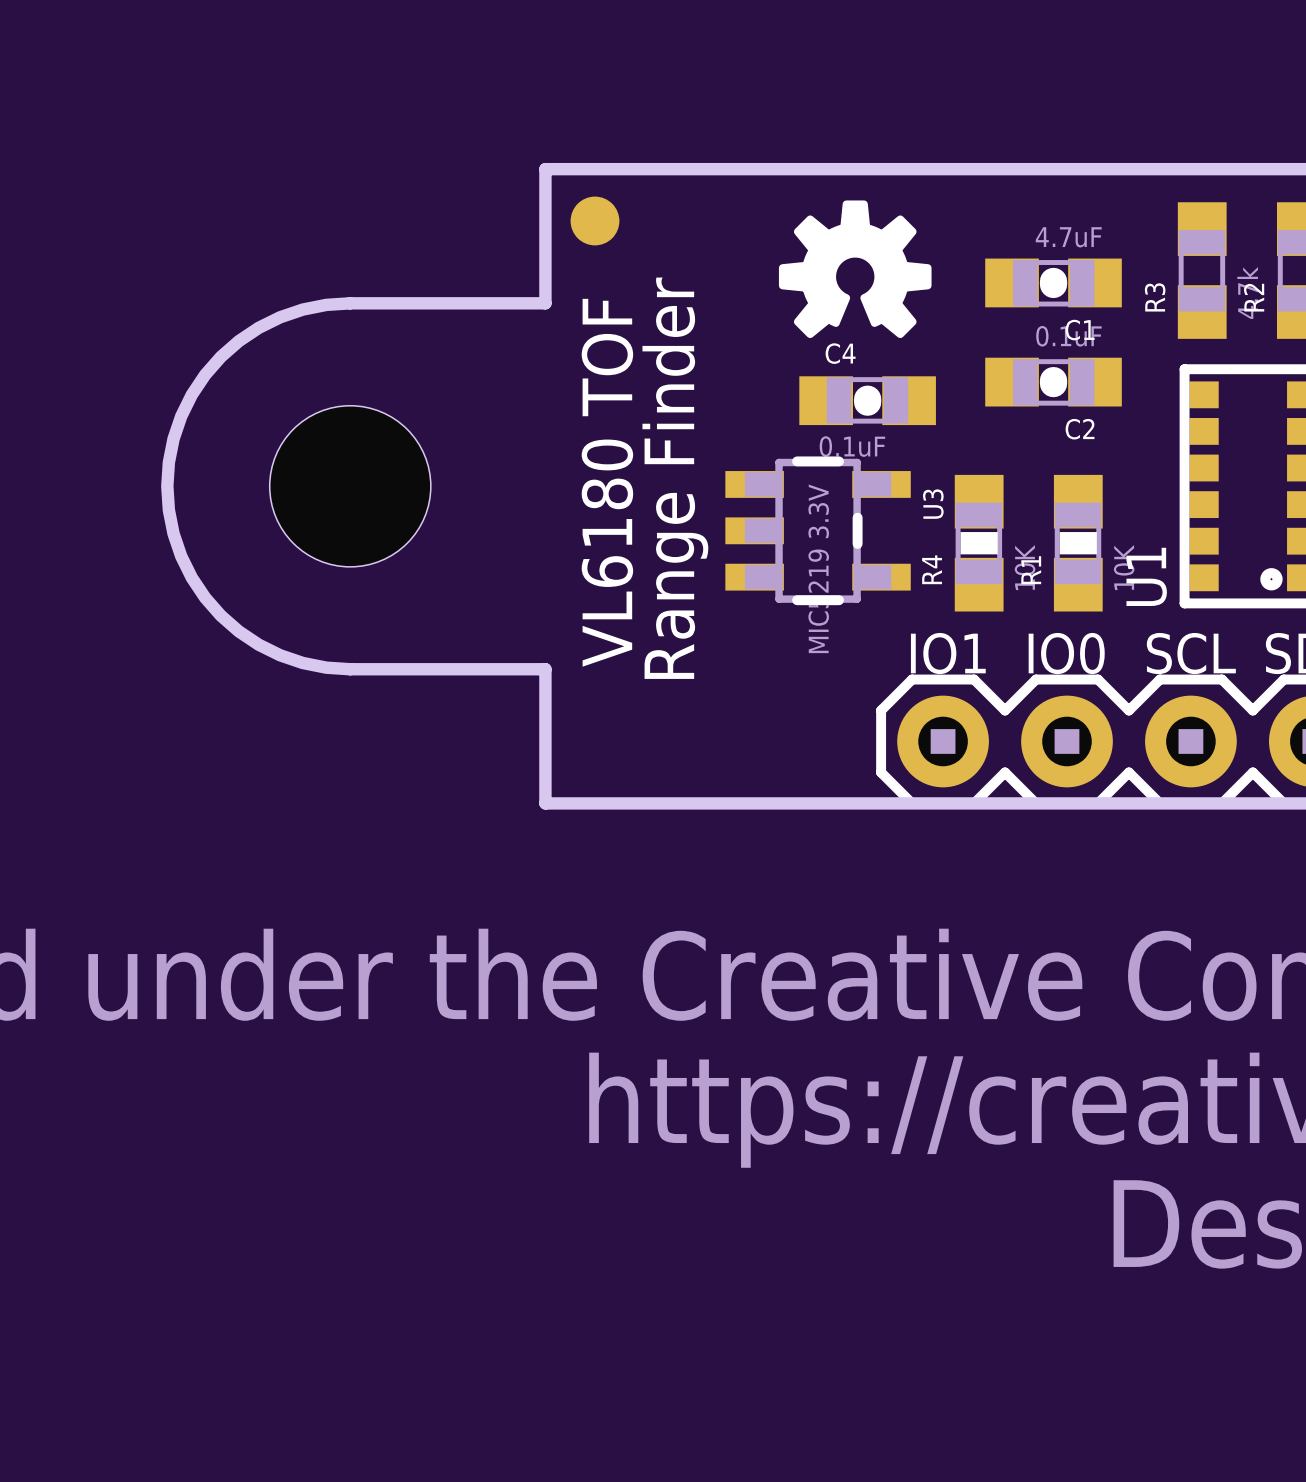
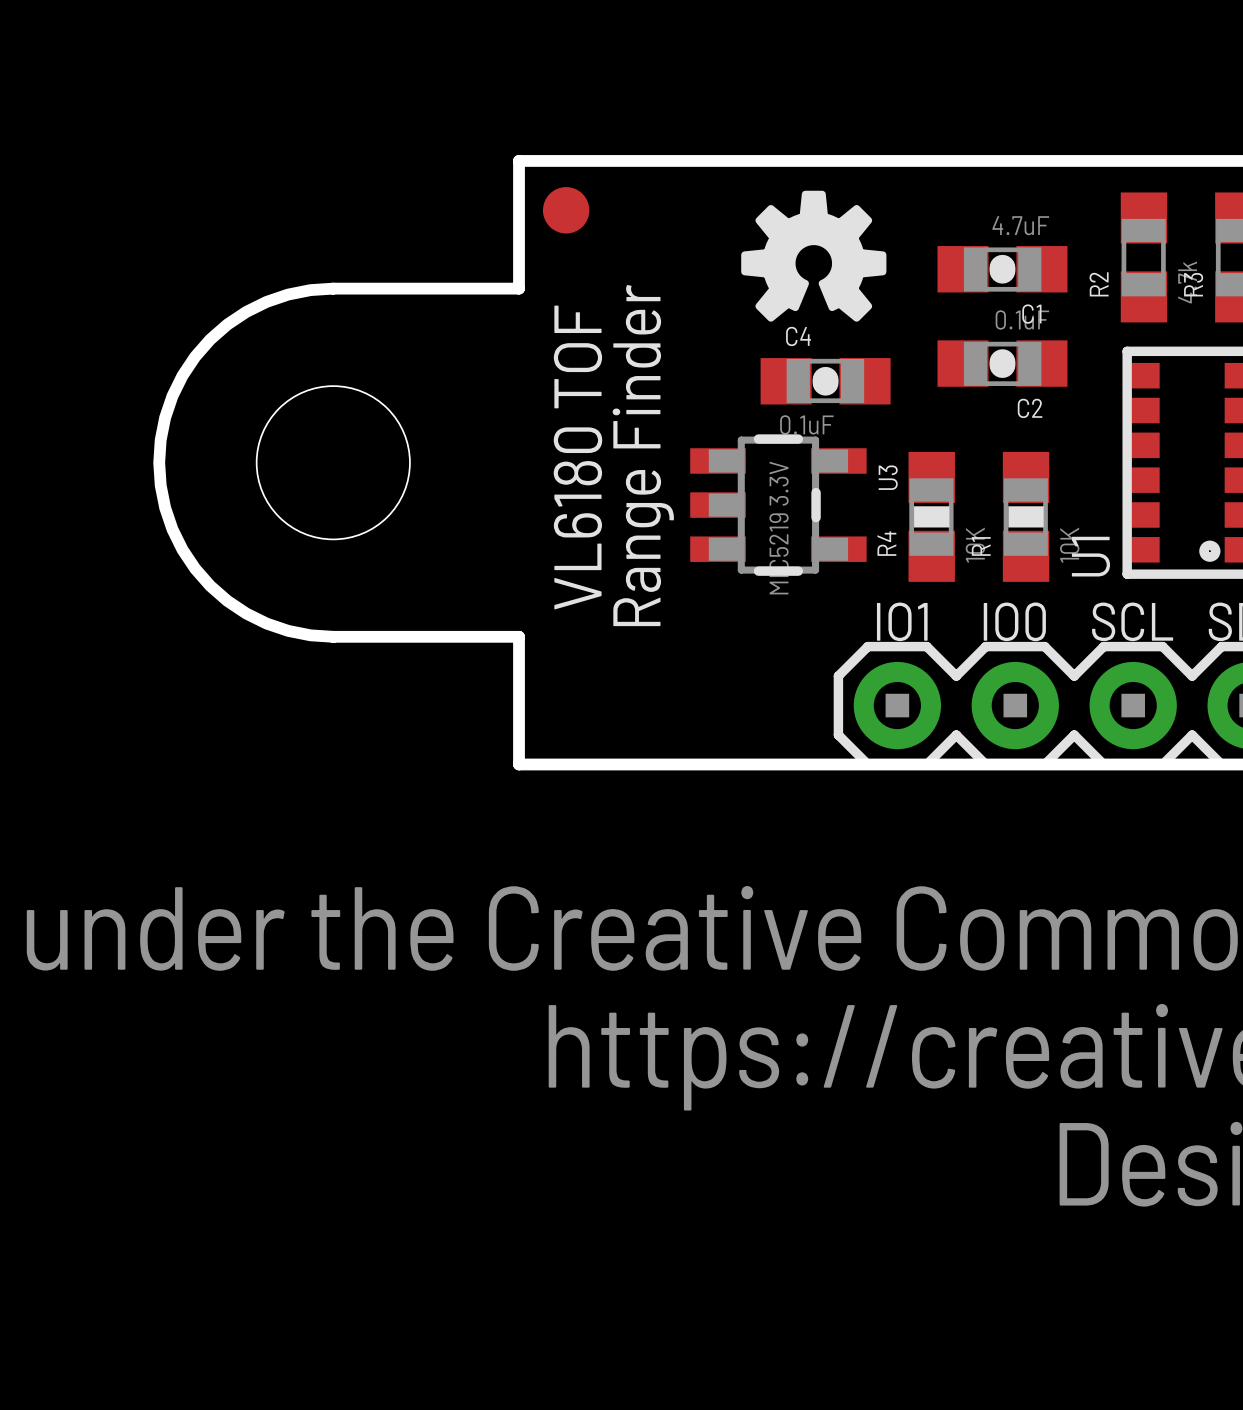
R3 name: R3 (1155, 297) -> R2 (1099, 284)
R2 name: R2 (1254, 297) -> R3 (1193, 284)

